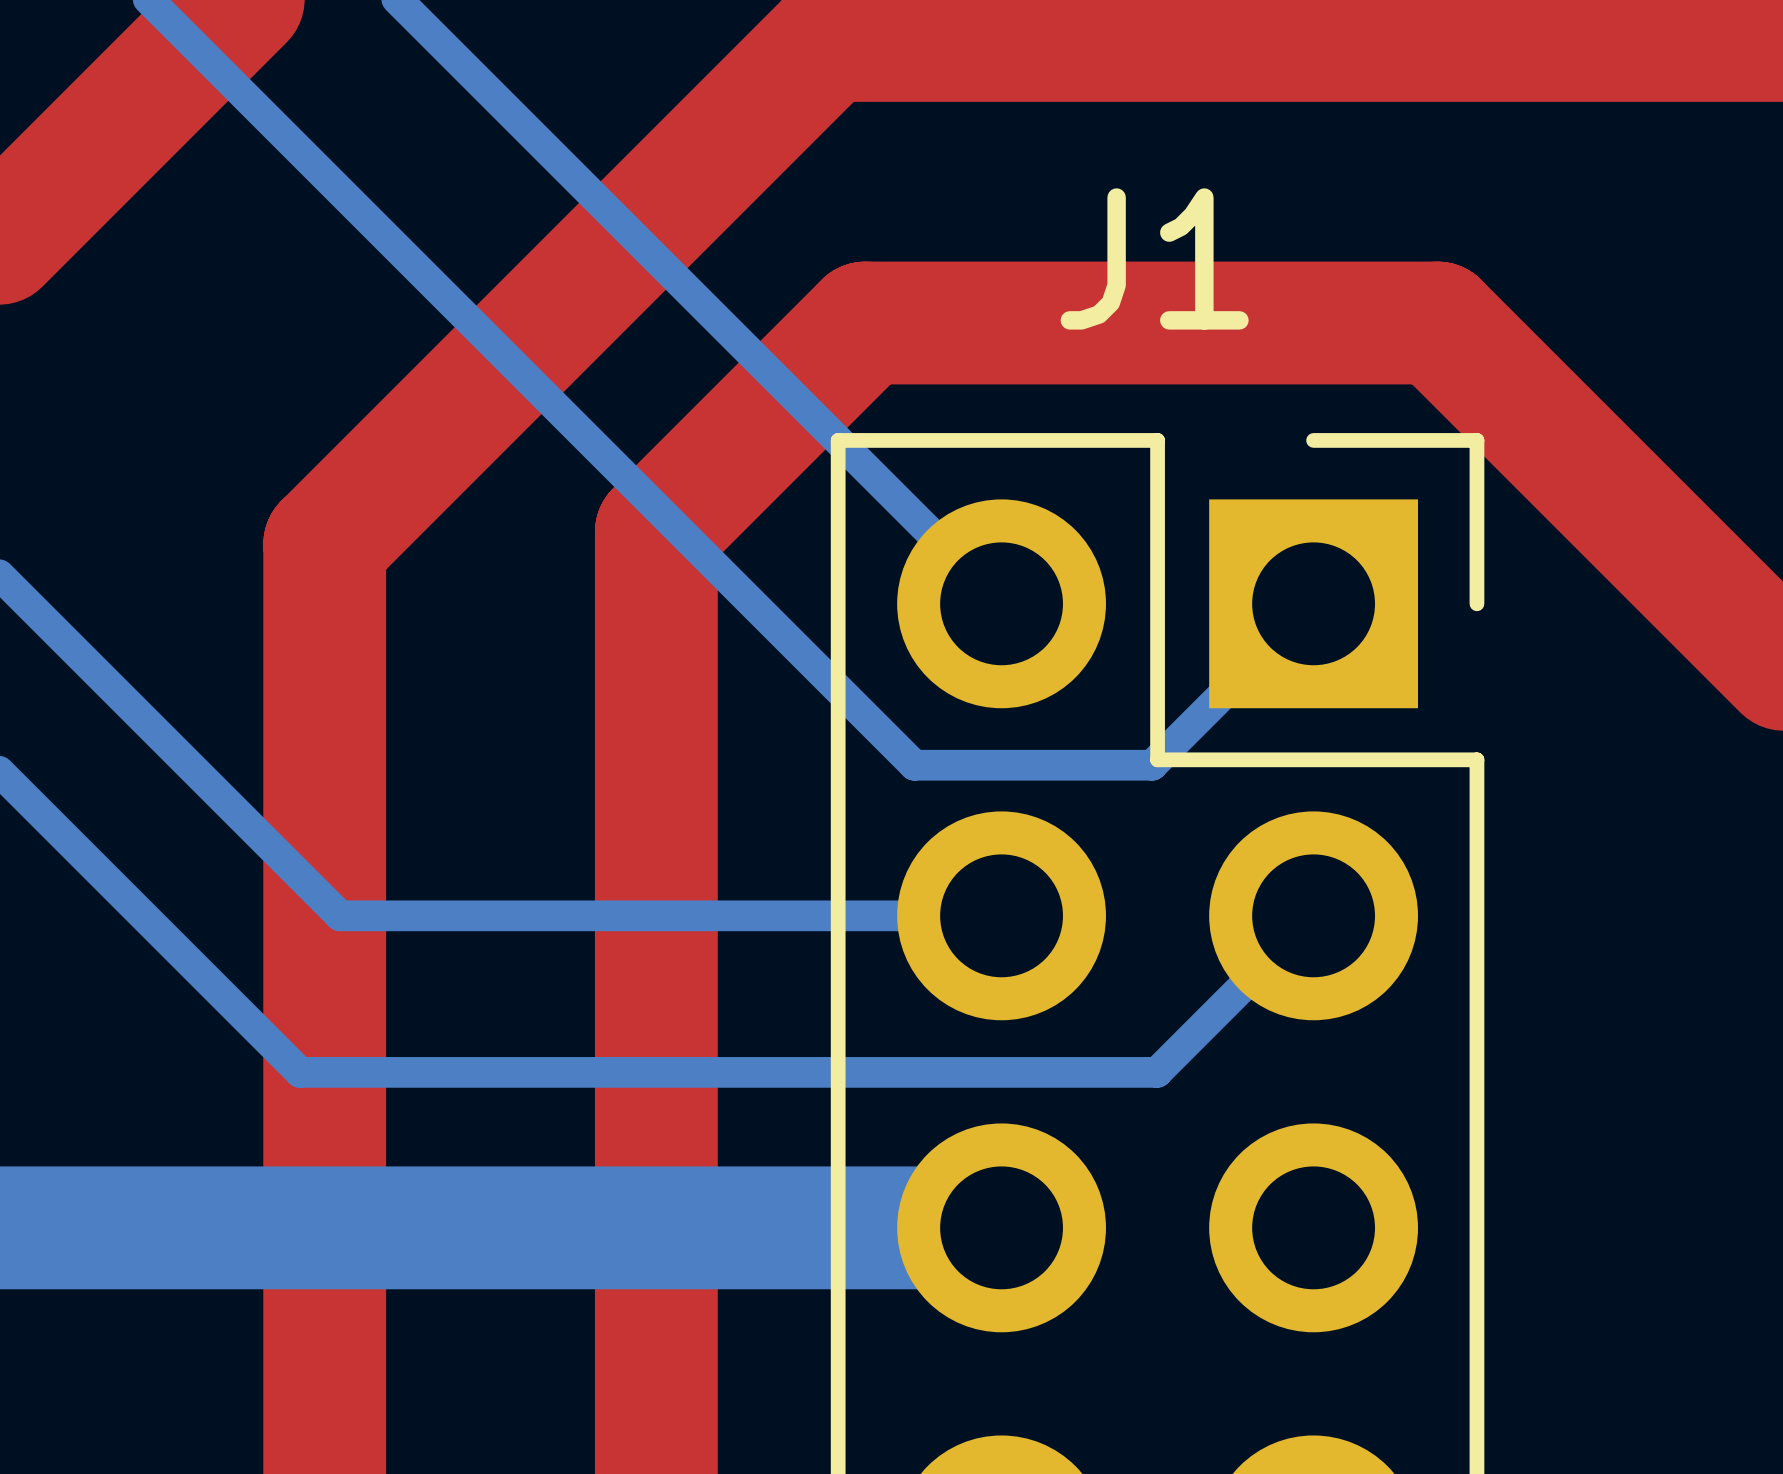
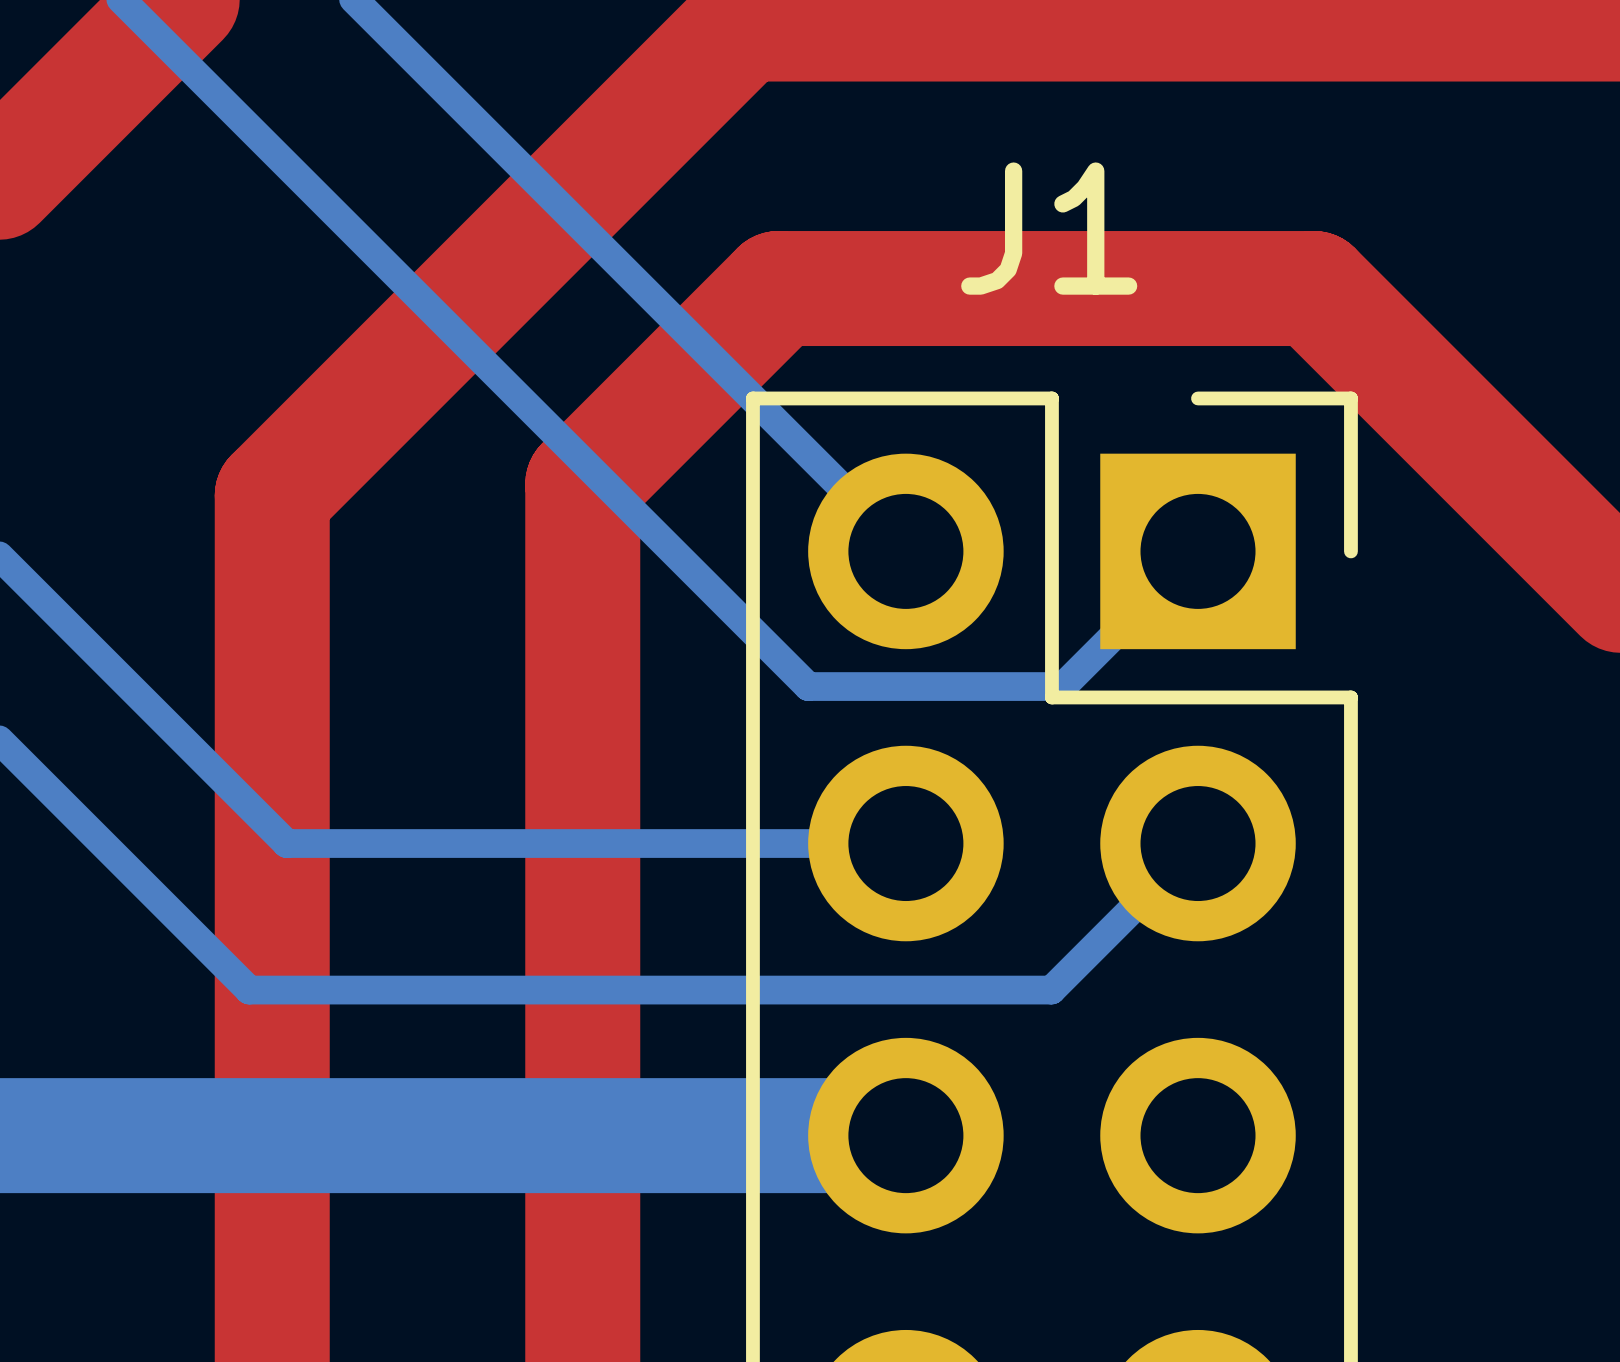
bottom track: (1169, 748) (1152, 765) (914, 765) (897, 748) -> (1062, 686) (808, 686)

